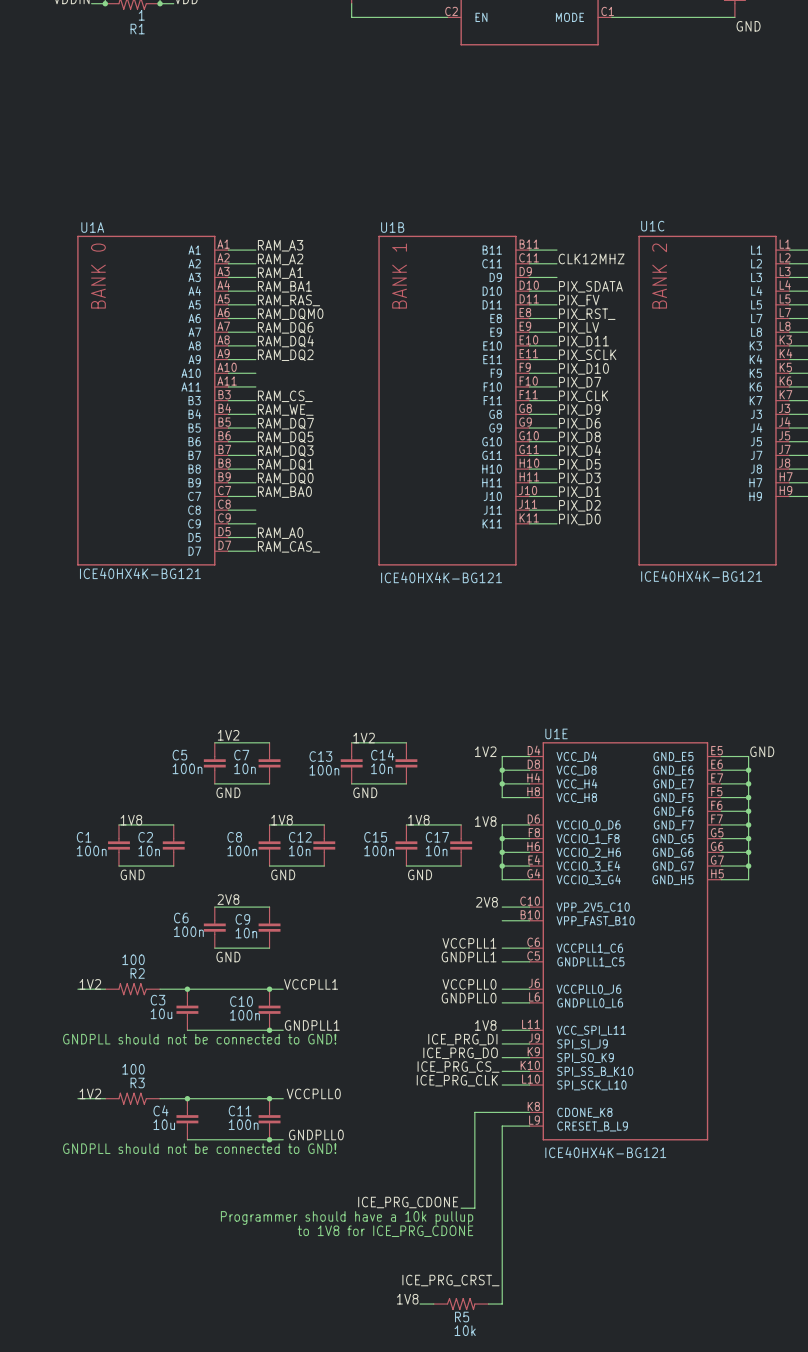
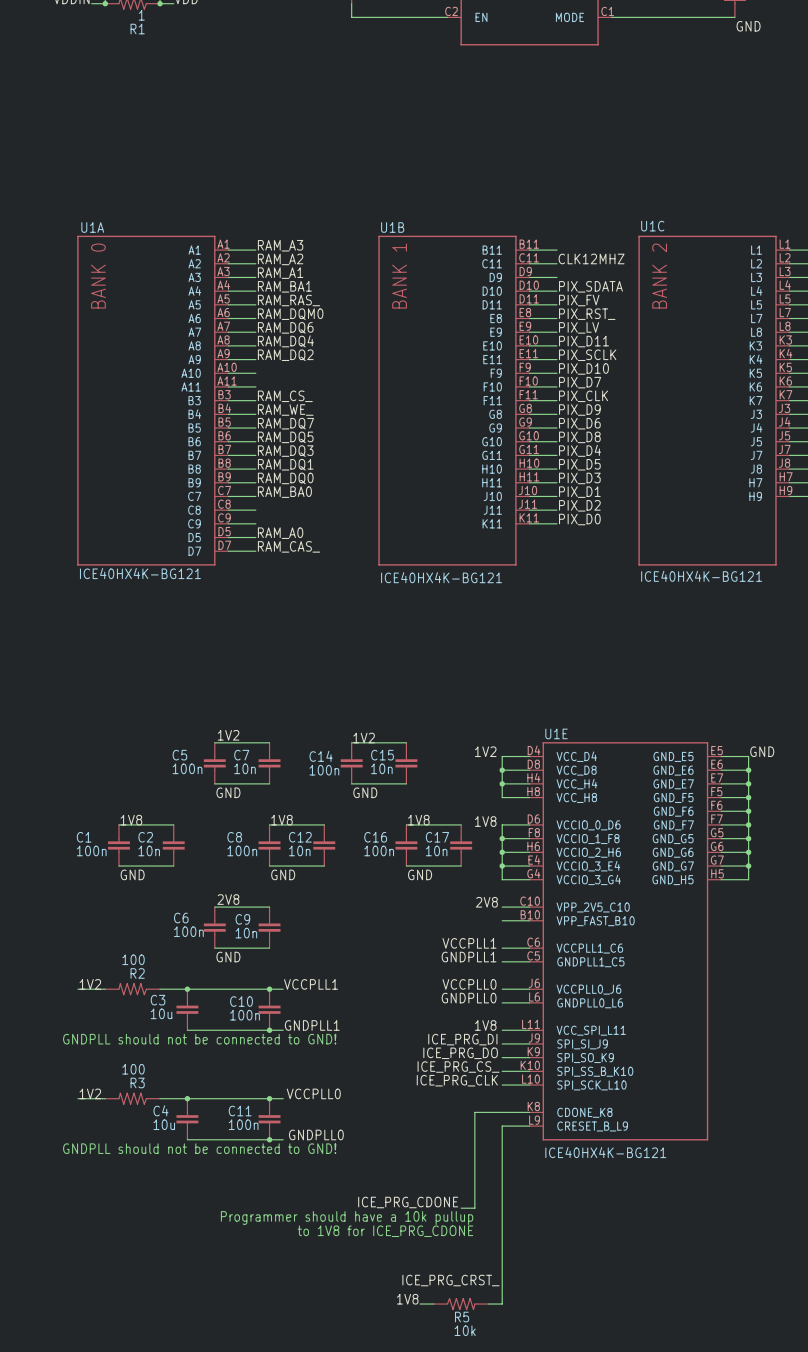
C14 name: C14 (382, 754) -> C15 (382, 755)
C13 name: C13 (320, 756) -> C14 (321, 756)
C15 name: C15 (375, 837) -> C16 (375, 837)

